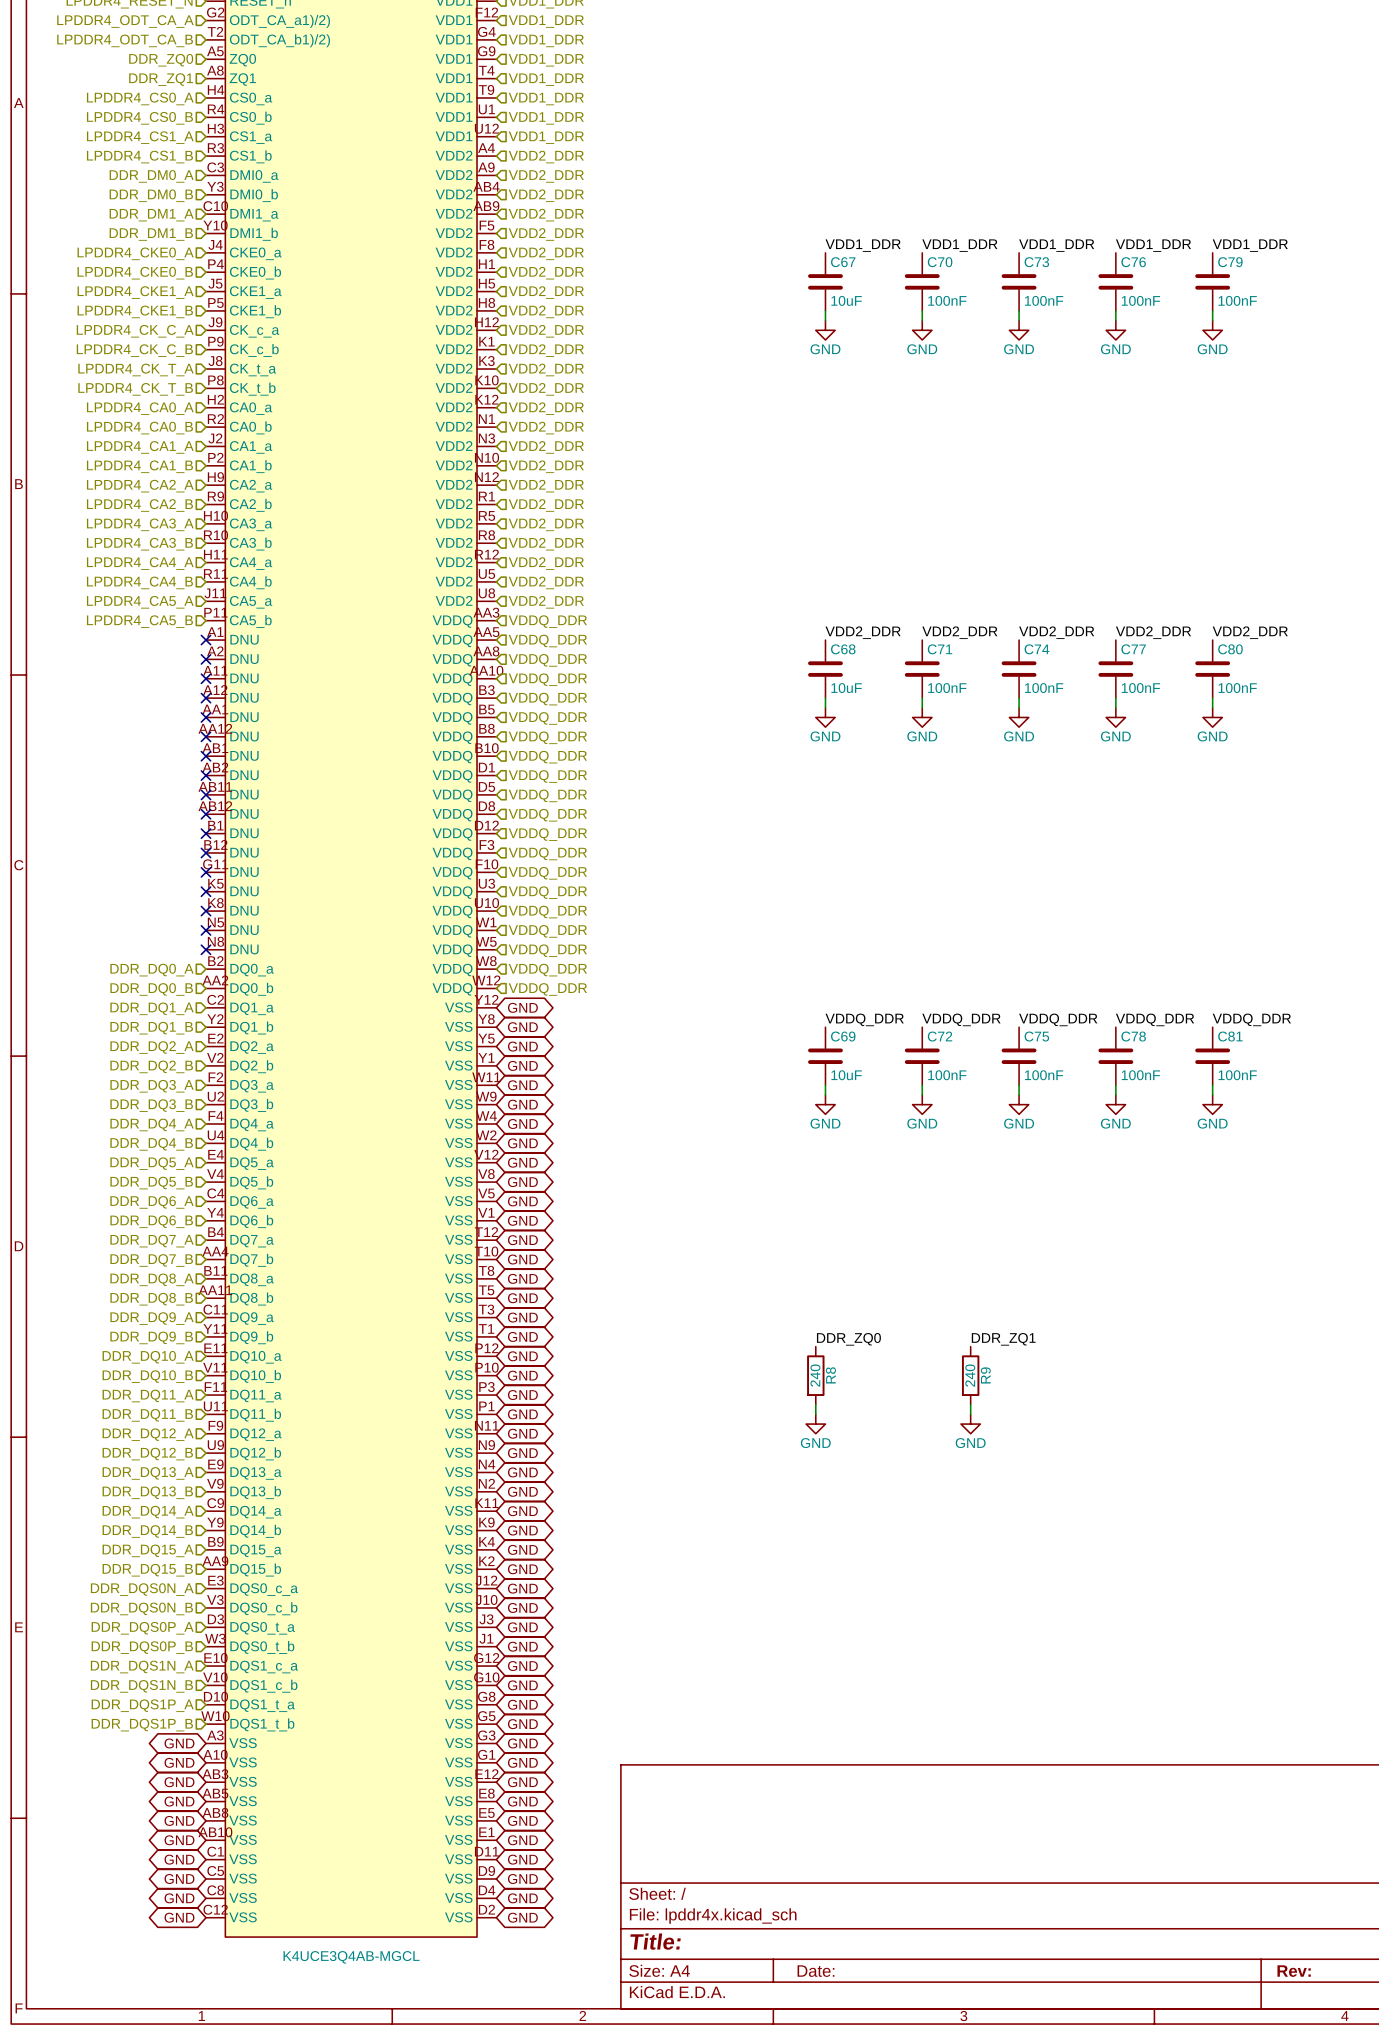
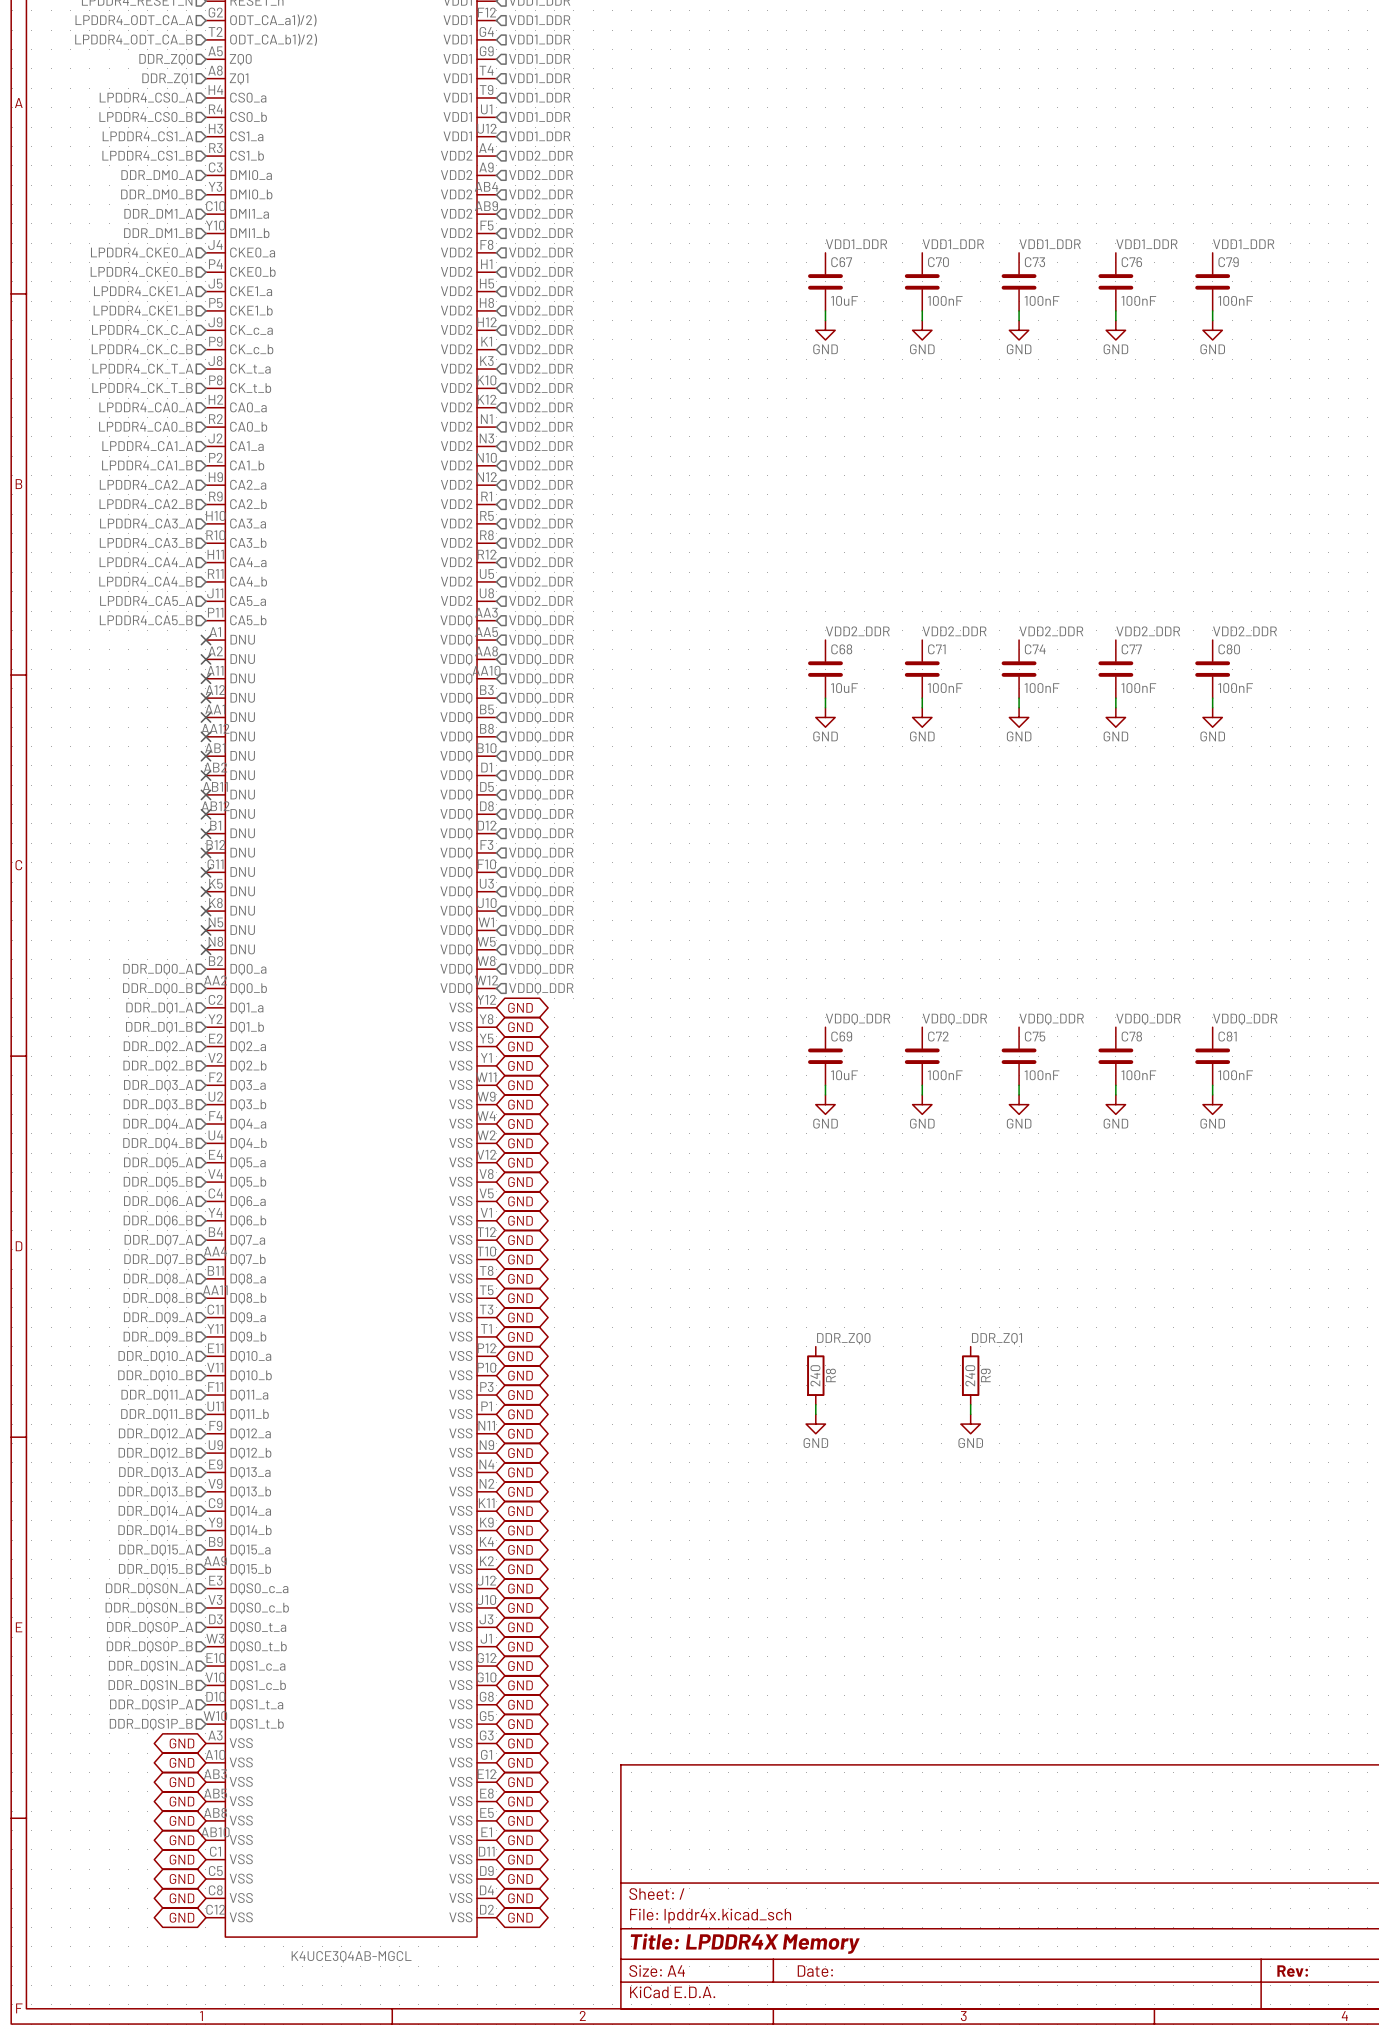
title block: Title: (655, 1941) -> Title: LPDDR4X Memory (745, 1943)

